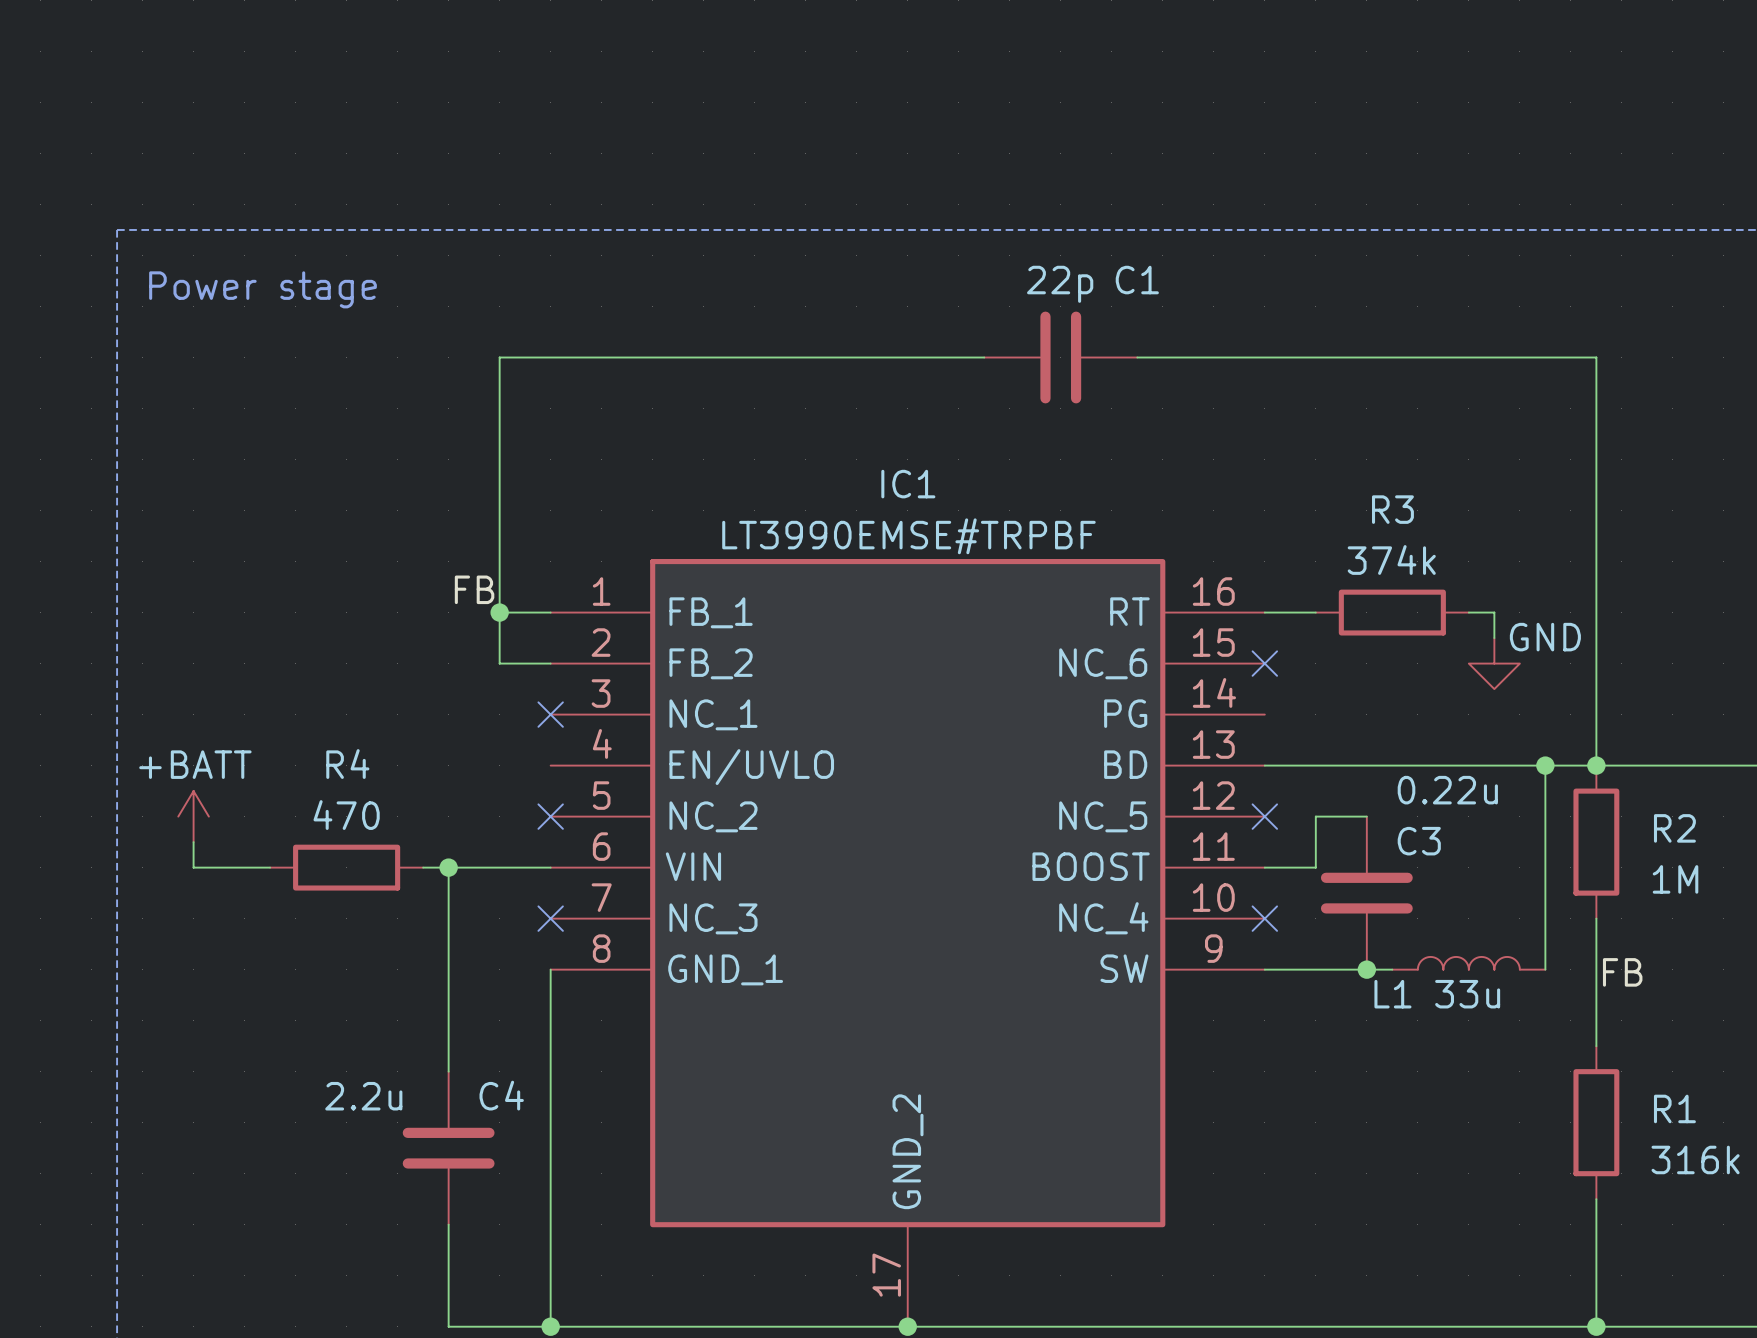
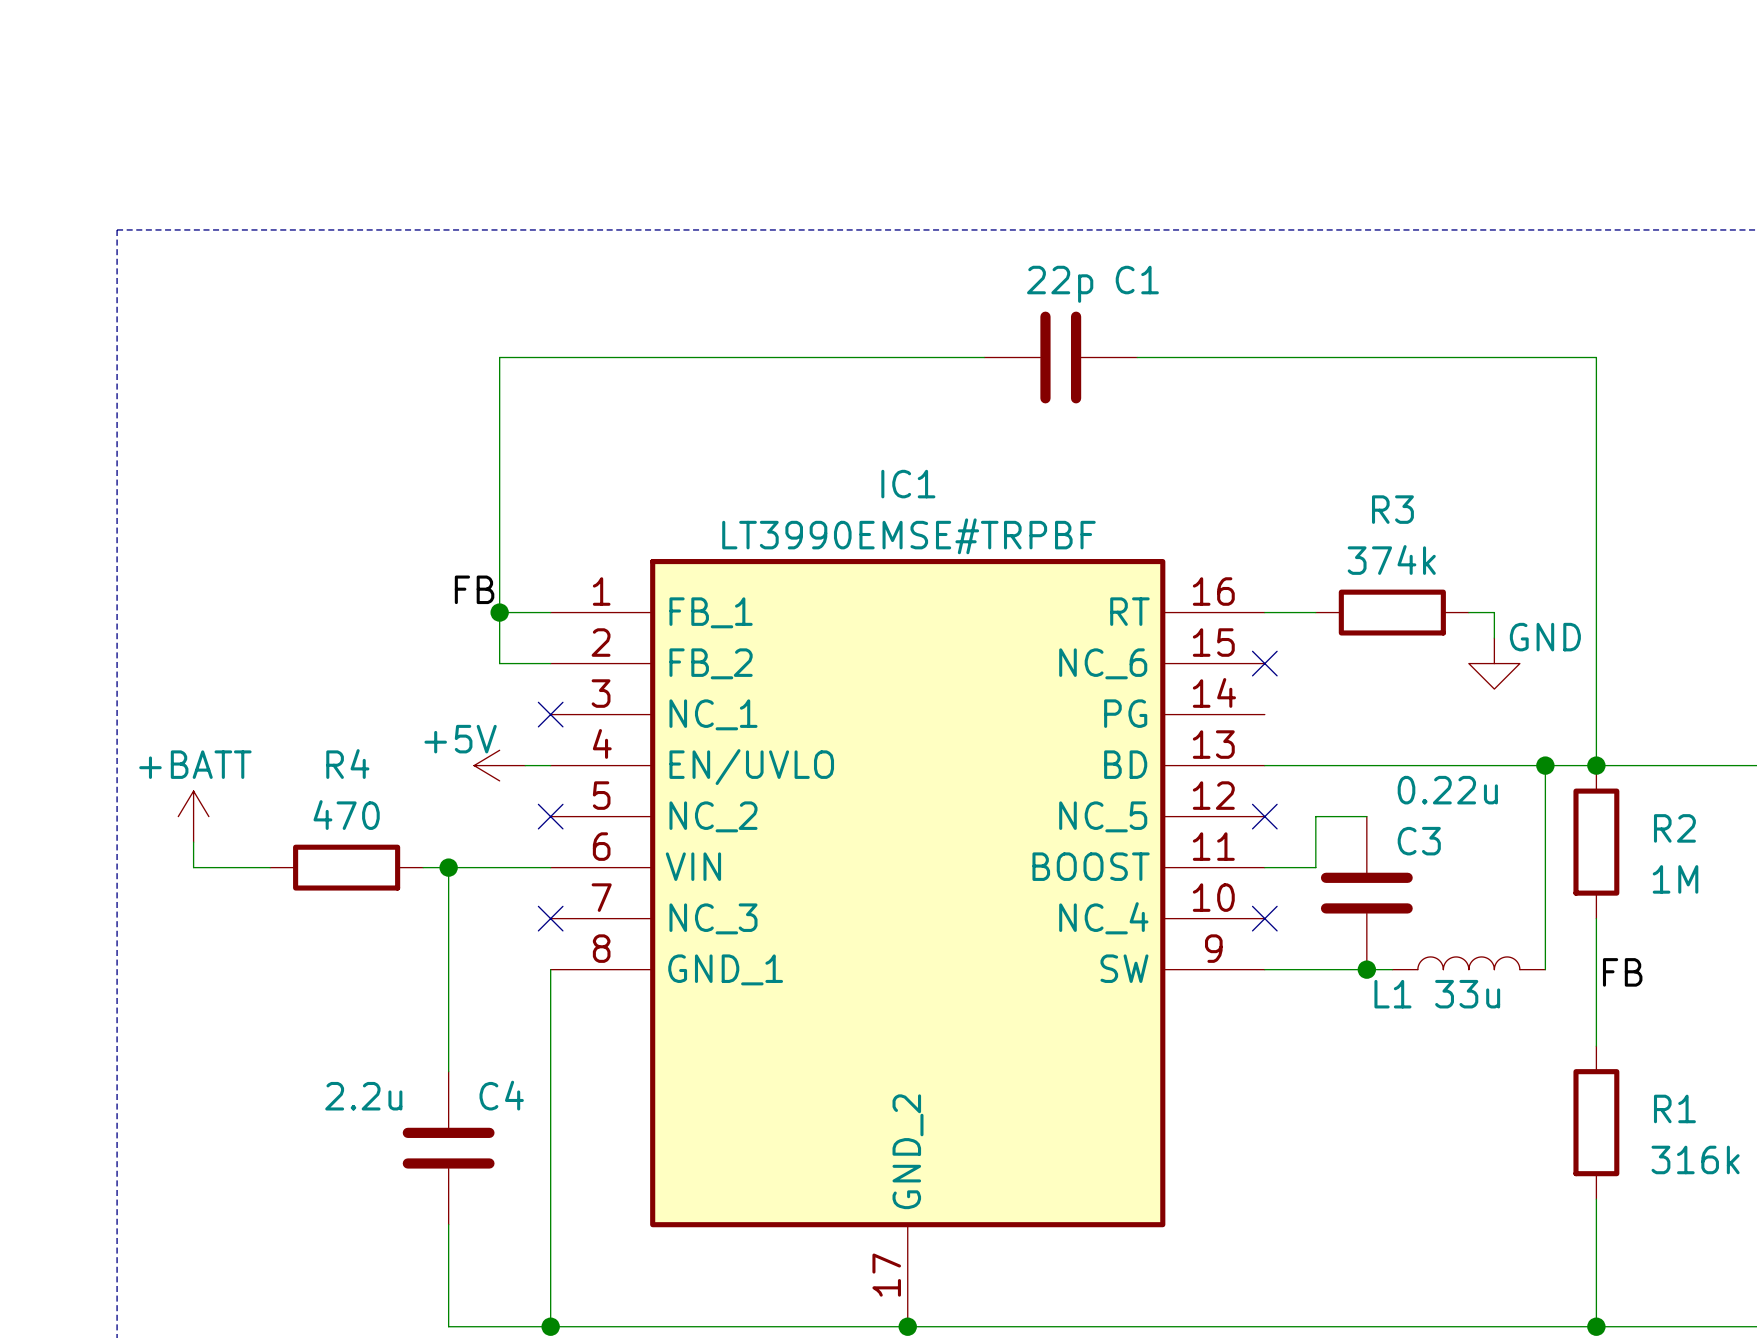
text: Power stage (263, 289) -> none
power symbol: none -> +5V (499, 765)
wire: none -> (525, 765) (550, 765)

